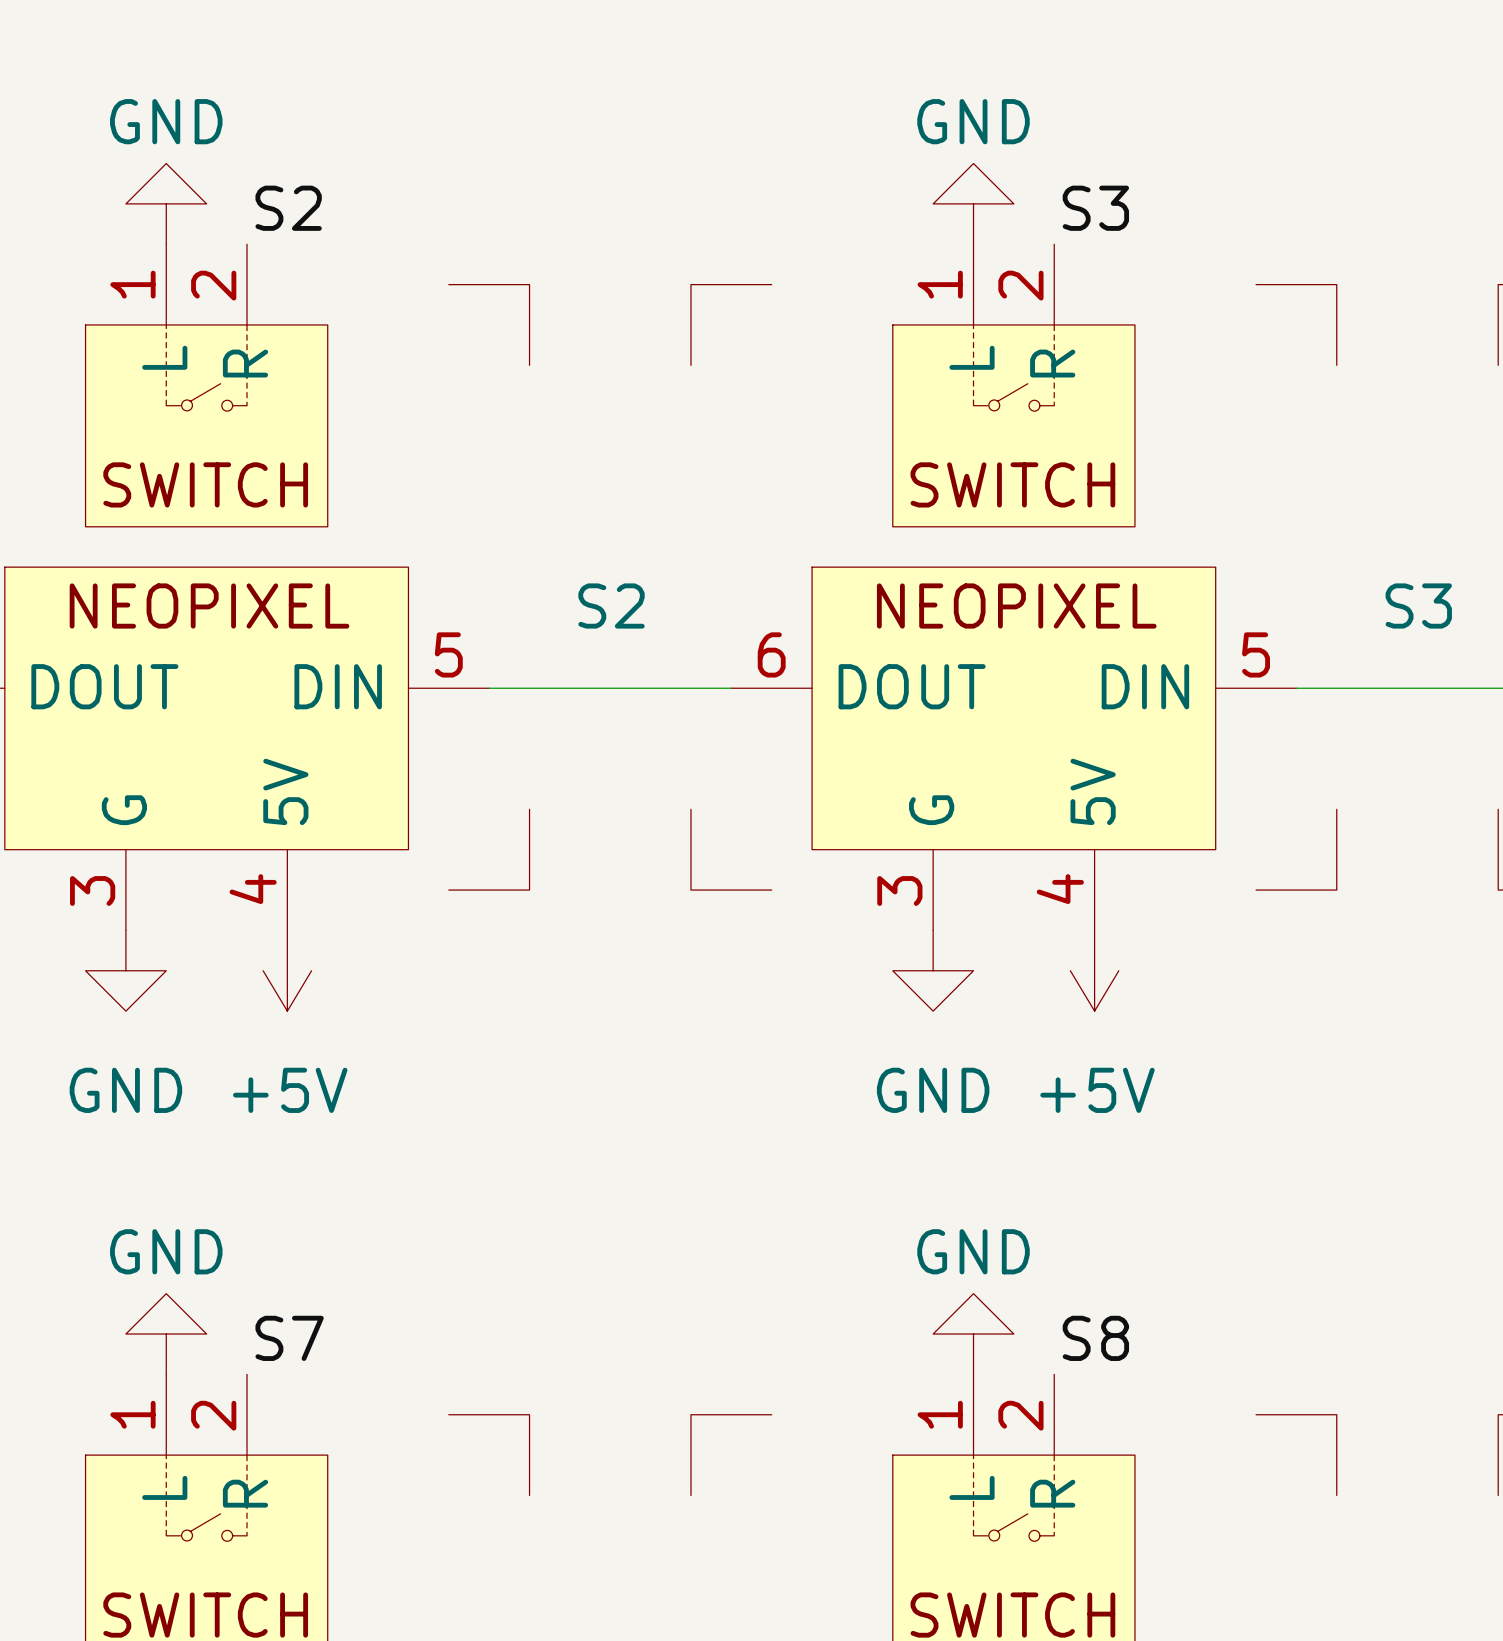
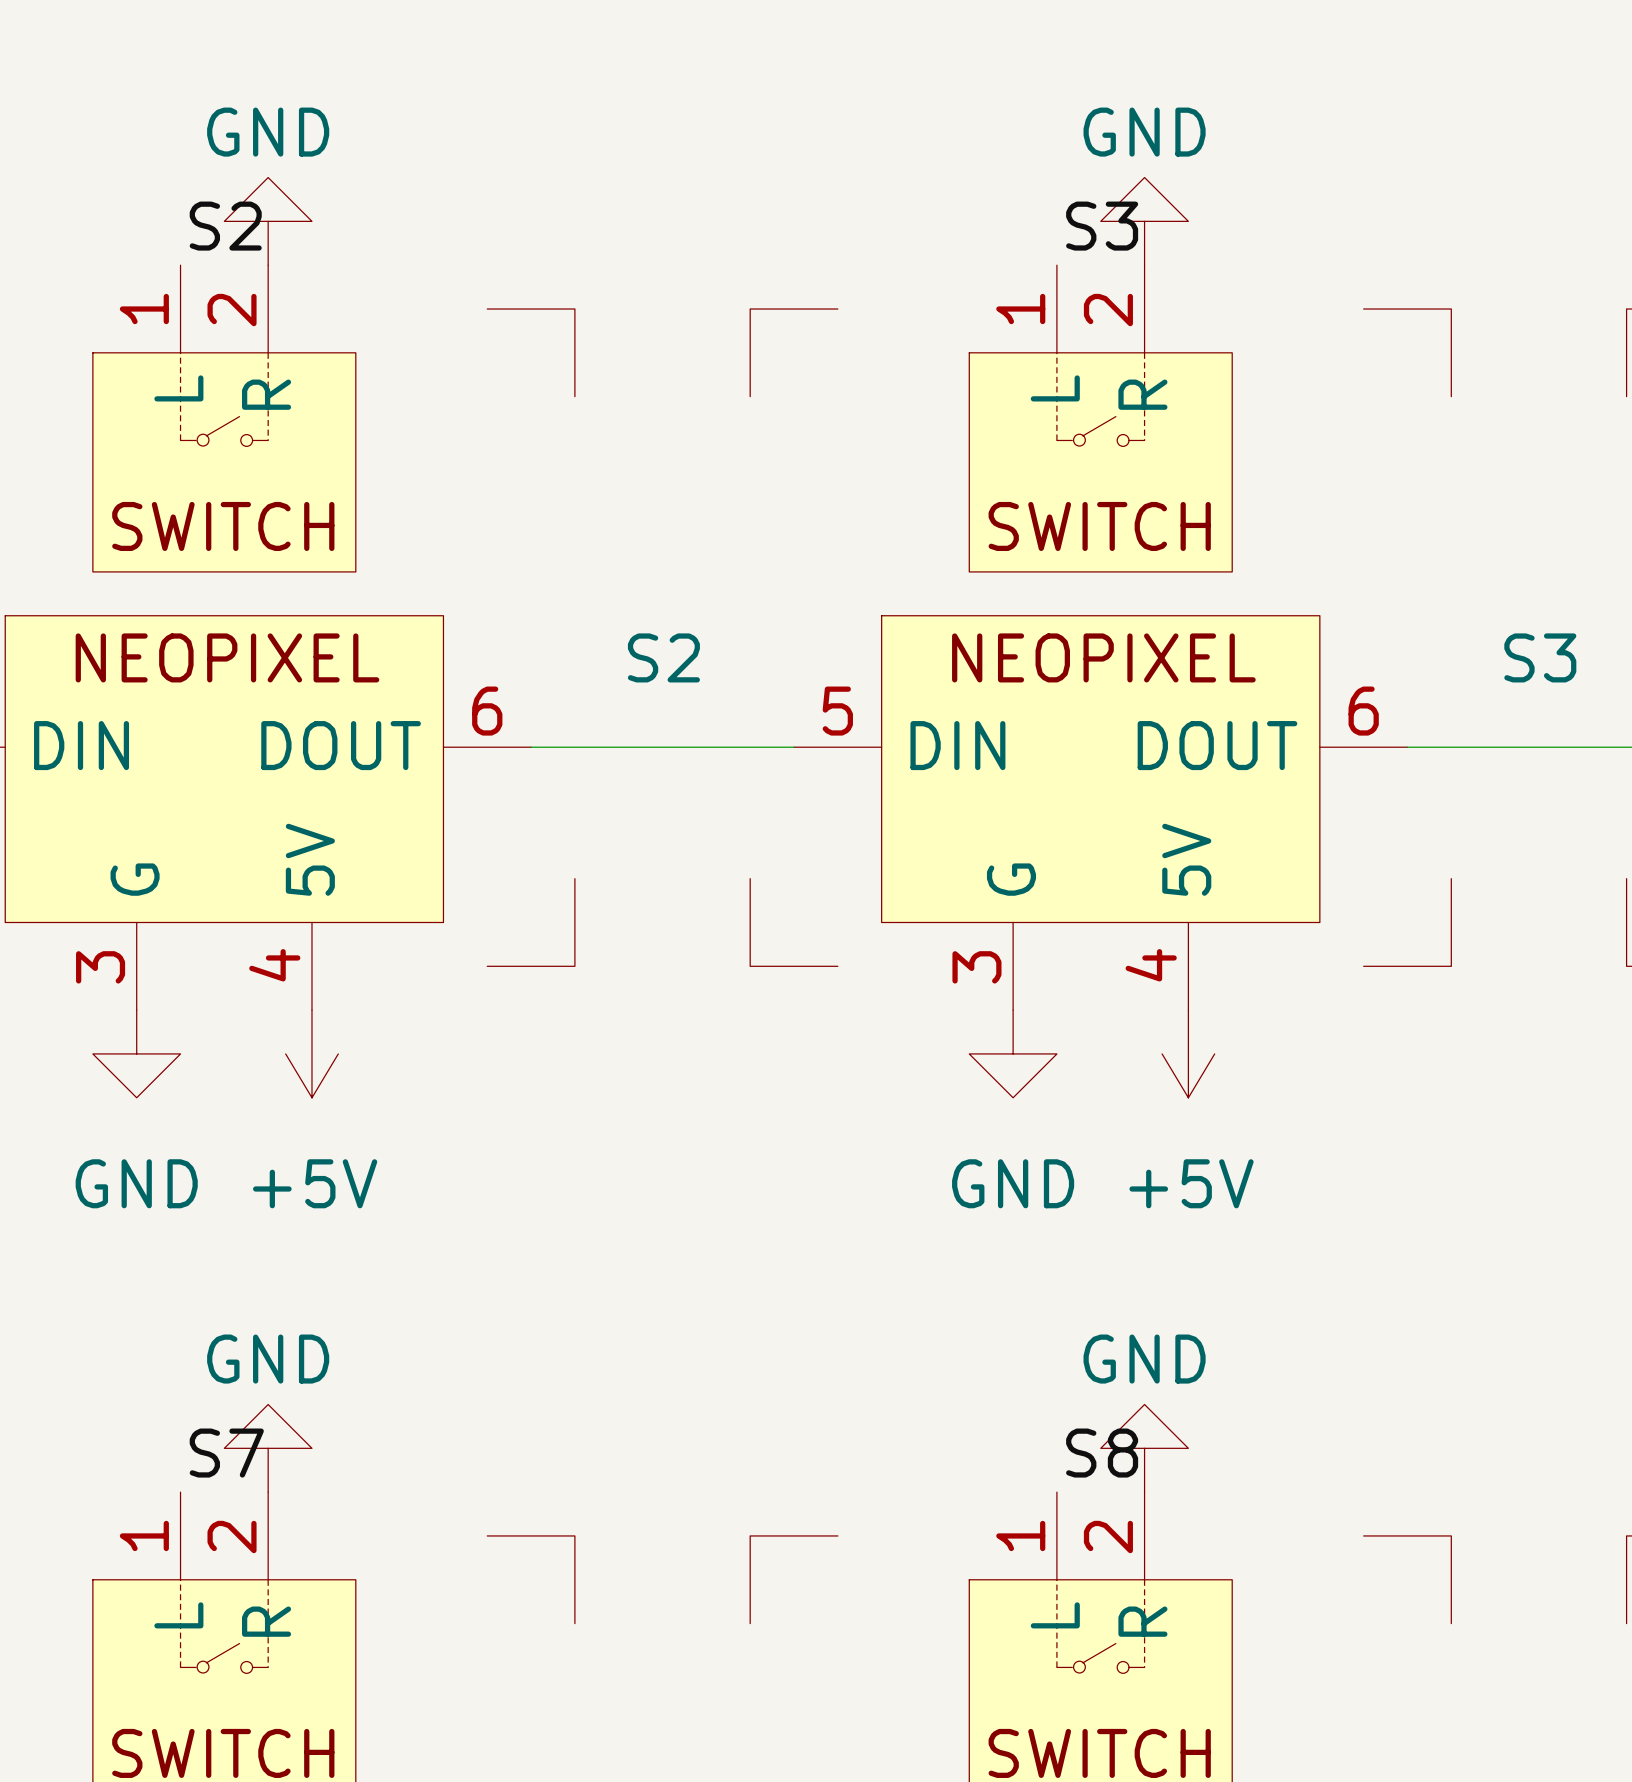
power symbol position: GND (166, 203) -> GND (268, 221)
power symbol position: GND (973, 203) -> GND (1144, 221)
label position: S2 (288, 208) -> S2 (225, 226)
label position: S3 (1095, 208) -> S3 (1102, 226)
S2 pin number: 5 (448, 654) -> 6 (487, 711)
S3 pin number: 6 (771, 654) -> 5 (837, 711)
S3 pin number: 5 (1256, 654) -> 6 (1363, 711)
S2 pin name: DOUT (104, 686) -> DIN (81, 745)
S2 pin name: DIN (338, 686) -> DOUT (341, 745)
S3 pin name: DOUT (912, 686) -> DIN (957, 745)
S3 pin name: DIN (1145, 686) -> DOUT (1217, 745)
power symbol position: GND (166, 1334) -> GND (268, 1448)
power symbol position: GND (973, 1334) -> GND (1144, 1448)
label position: S7 (289, 1338) -> S7 (226, 1453)
label position: S8 (1095, 1338) -> S8 (1102, 1453)

